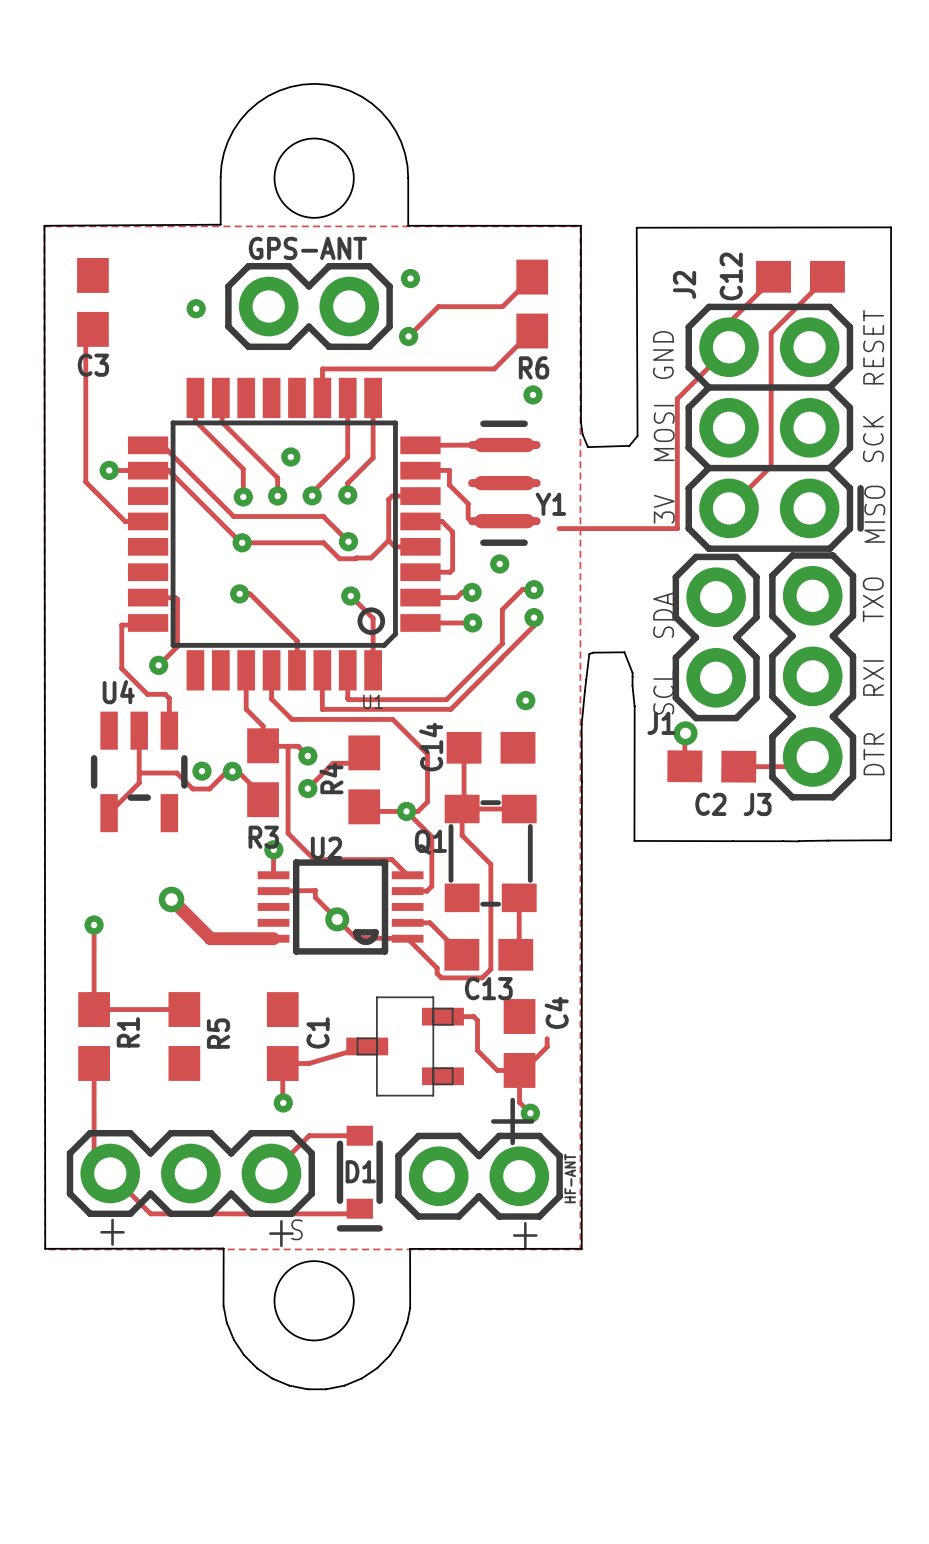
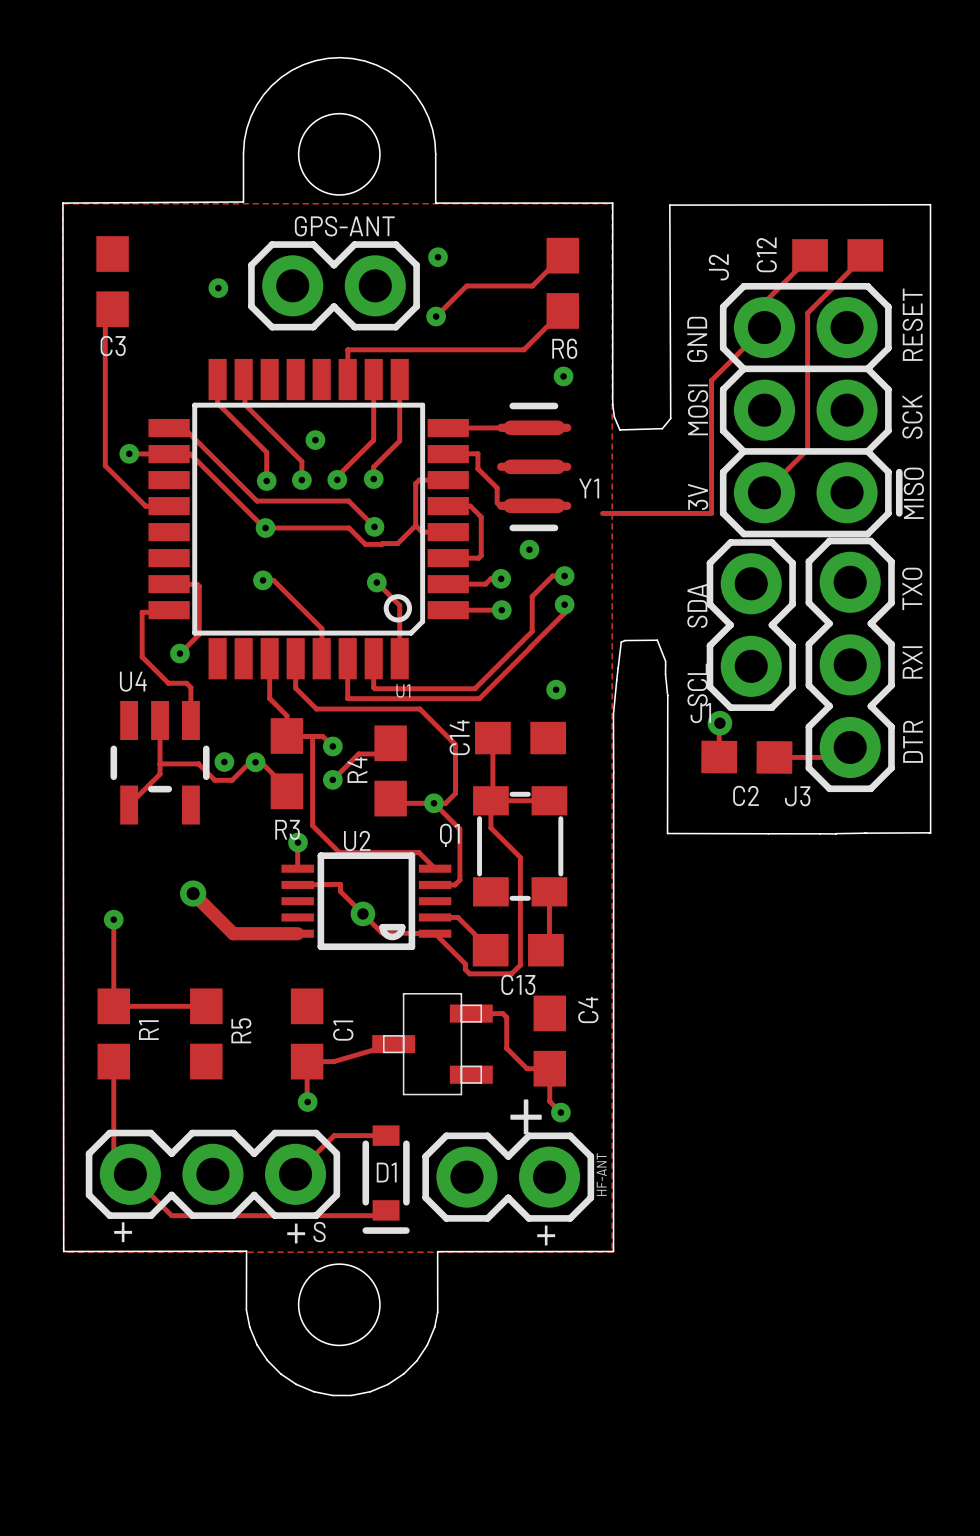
track: (559, 528) (571, 528) -> none
track: (547, 1038) (547, 1046) (523, 1070) -> none

